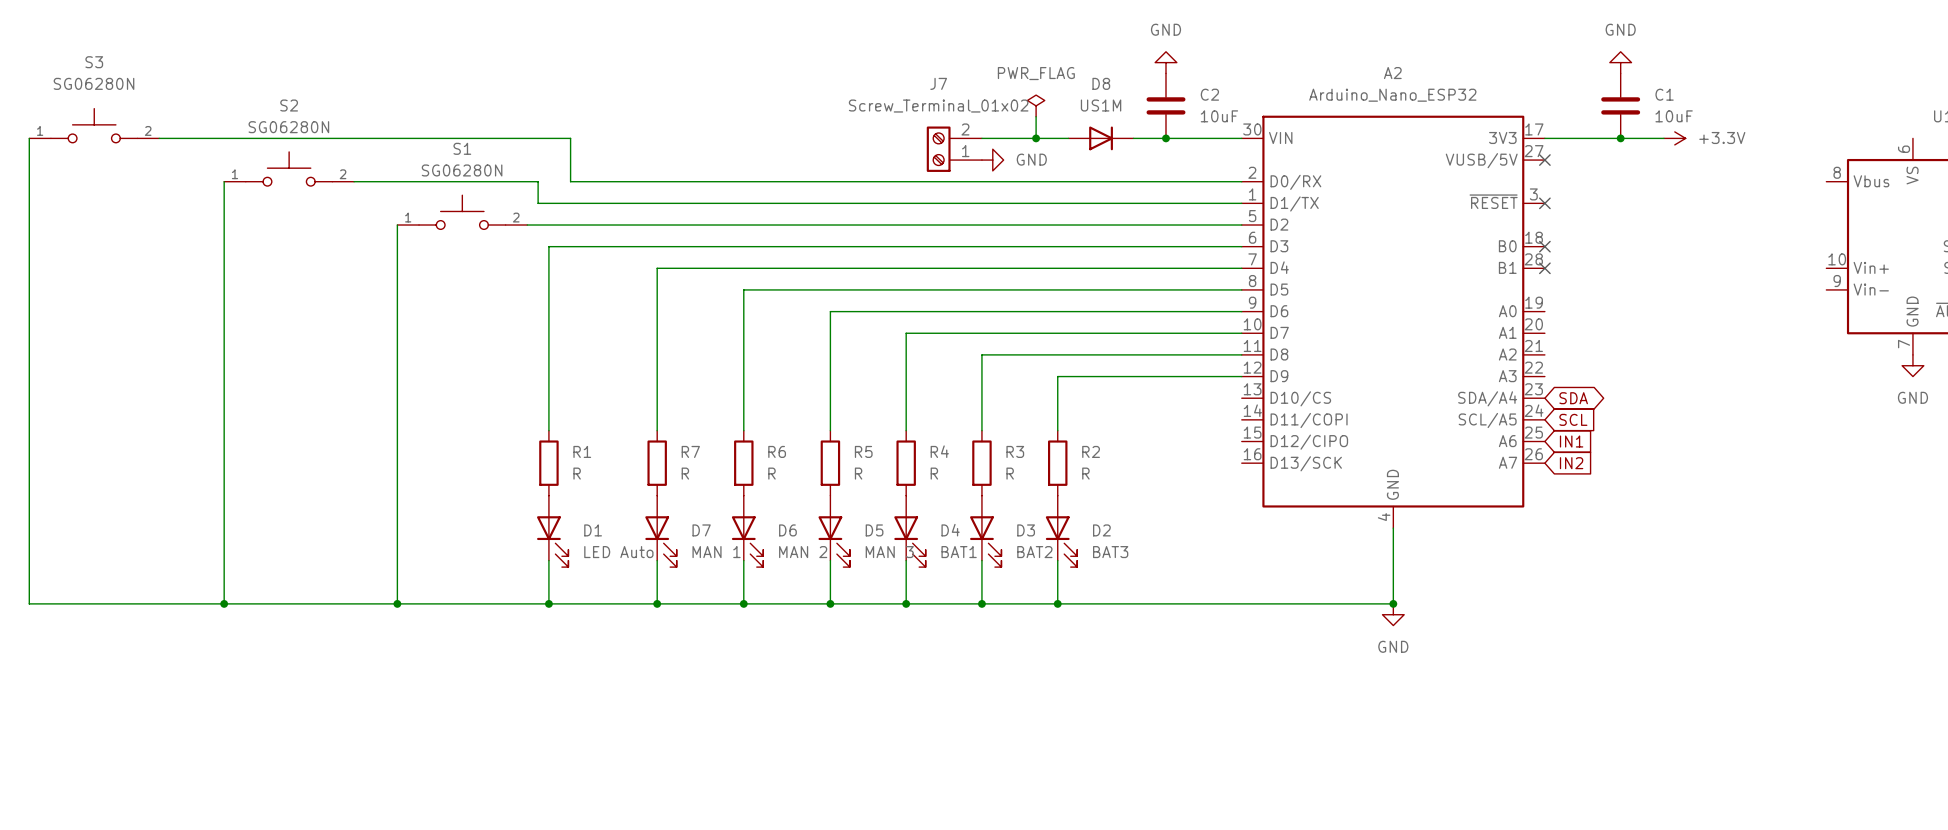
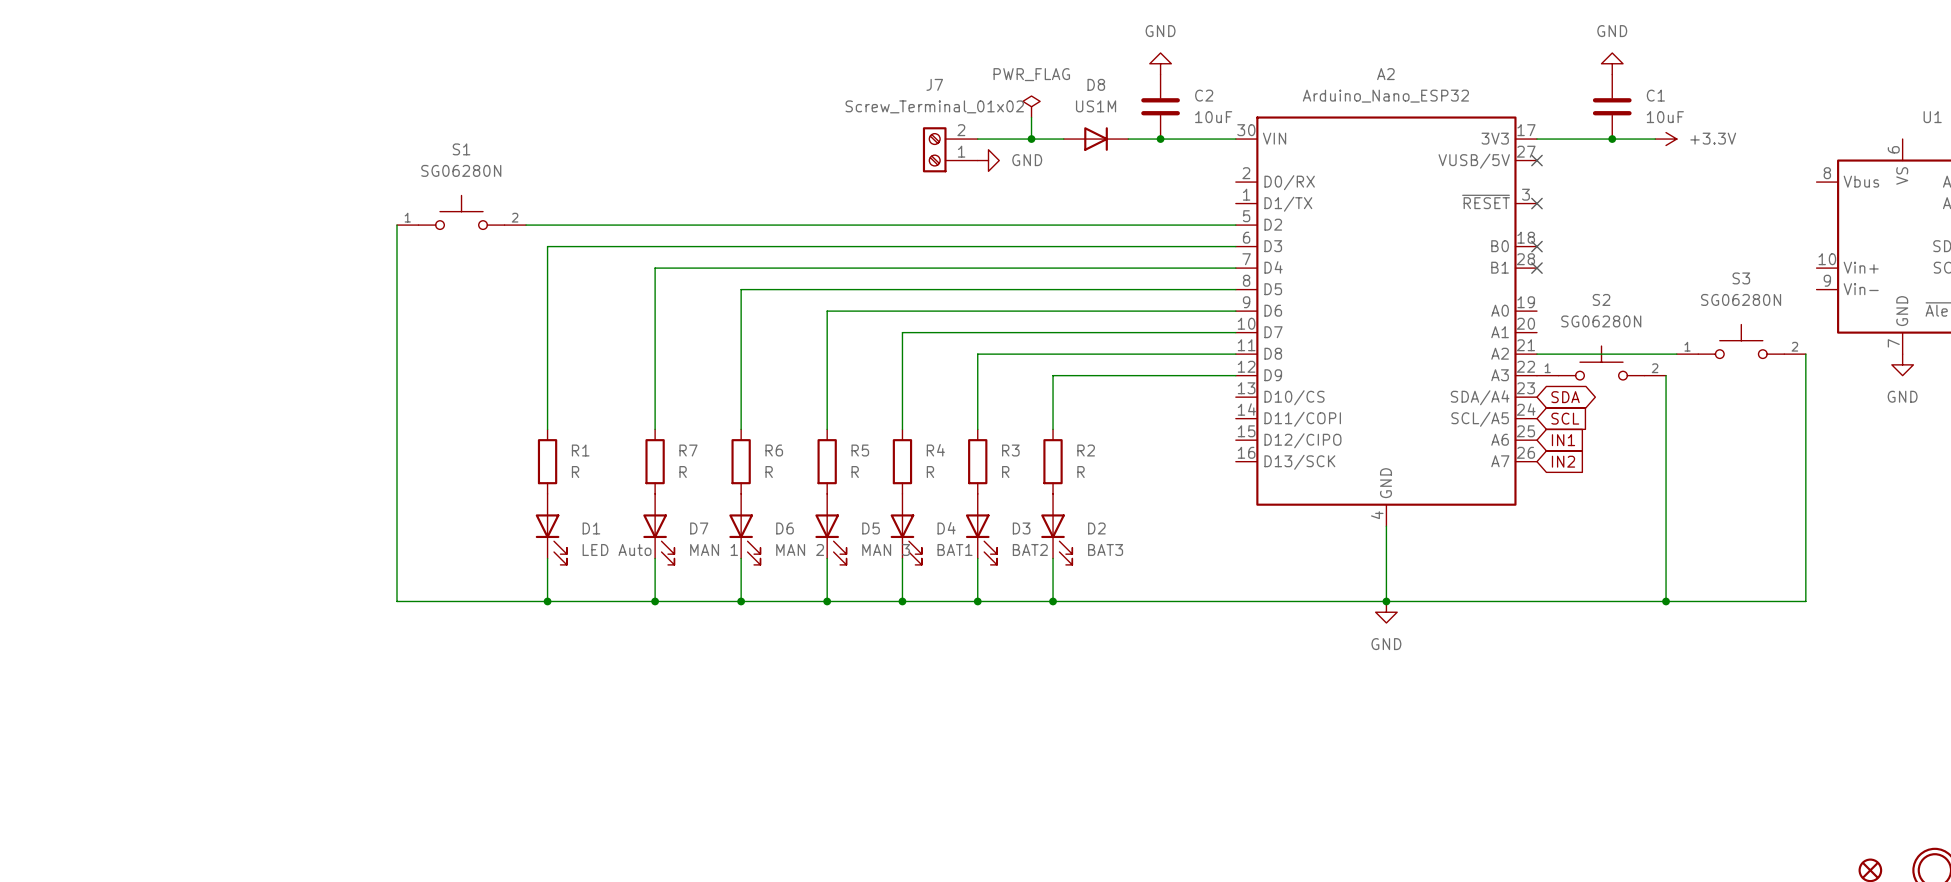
S3 position: (94, 125) -> (1741, 341)
wire: (29, 138) (29, 603) (397, 603) -> none
wire: (159, 138) (570, 138) (570, 181) (1241, 181) -> none
S2 position: (289, 168) -> (1601, 363)
wire: (224, 181) (224, 603) -> none
wire: (354, 181) (538, 181) (538, 203) (1241, 203) -> none
wire: none -> (1536, 354) (1676, 354)
wire: none -> (1805, 354) (1805, 601) (1386, 601)
wire: none -> (1666, 375) (1666, 601)
junction: (224, 603) -> none
junction: (397, 603) -> none
junction: none -> (1666, 601)

